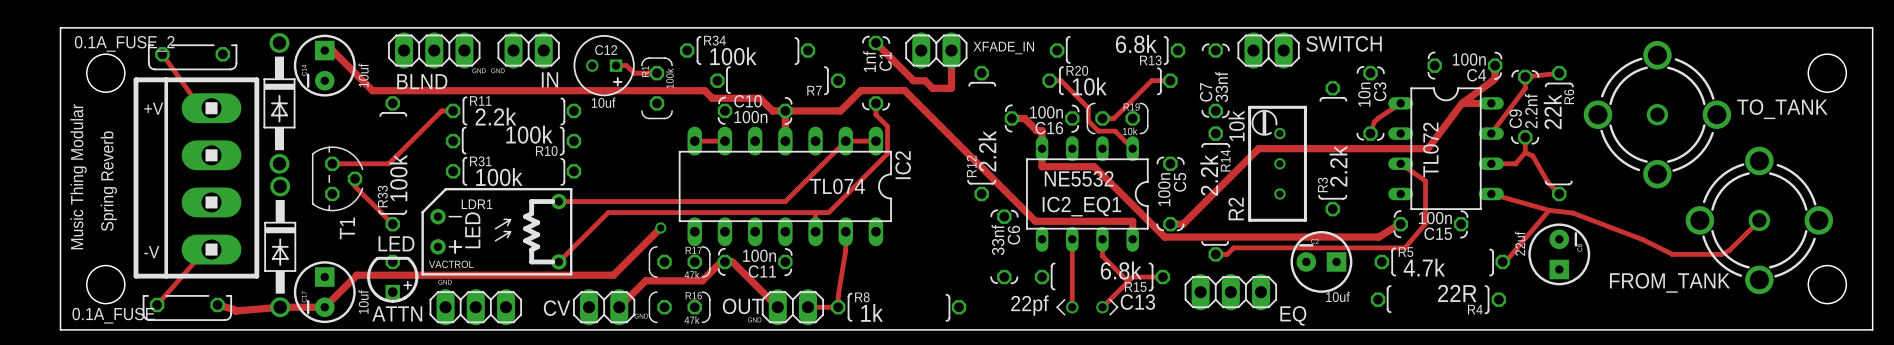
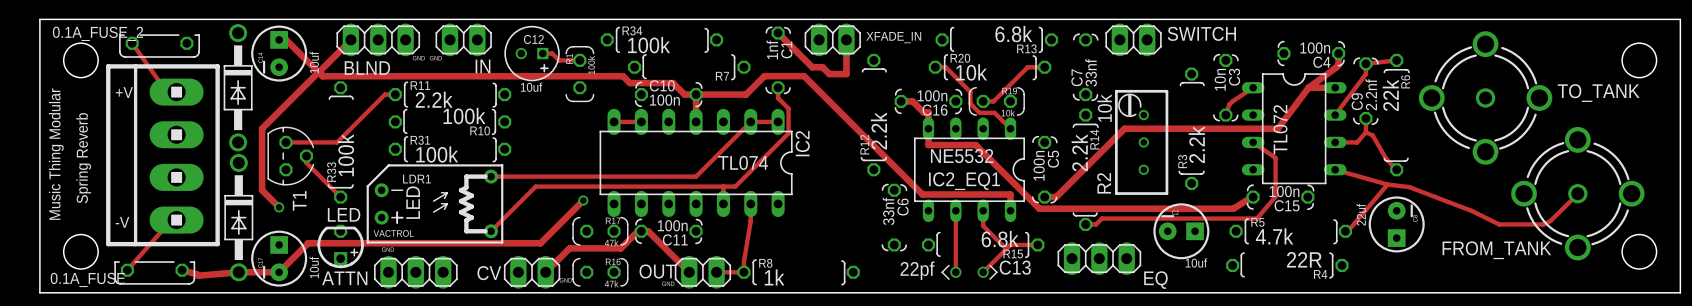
track: none -> (350, 39) (320, 70)
track: none -> (322, 72) (317, 72) (262, 128) (262, 190) (279, 207)
via: none -> (279, 207)

